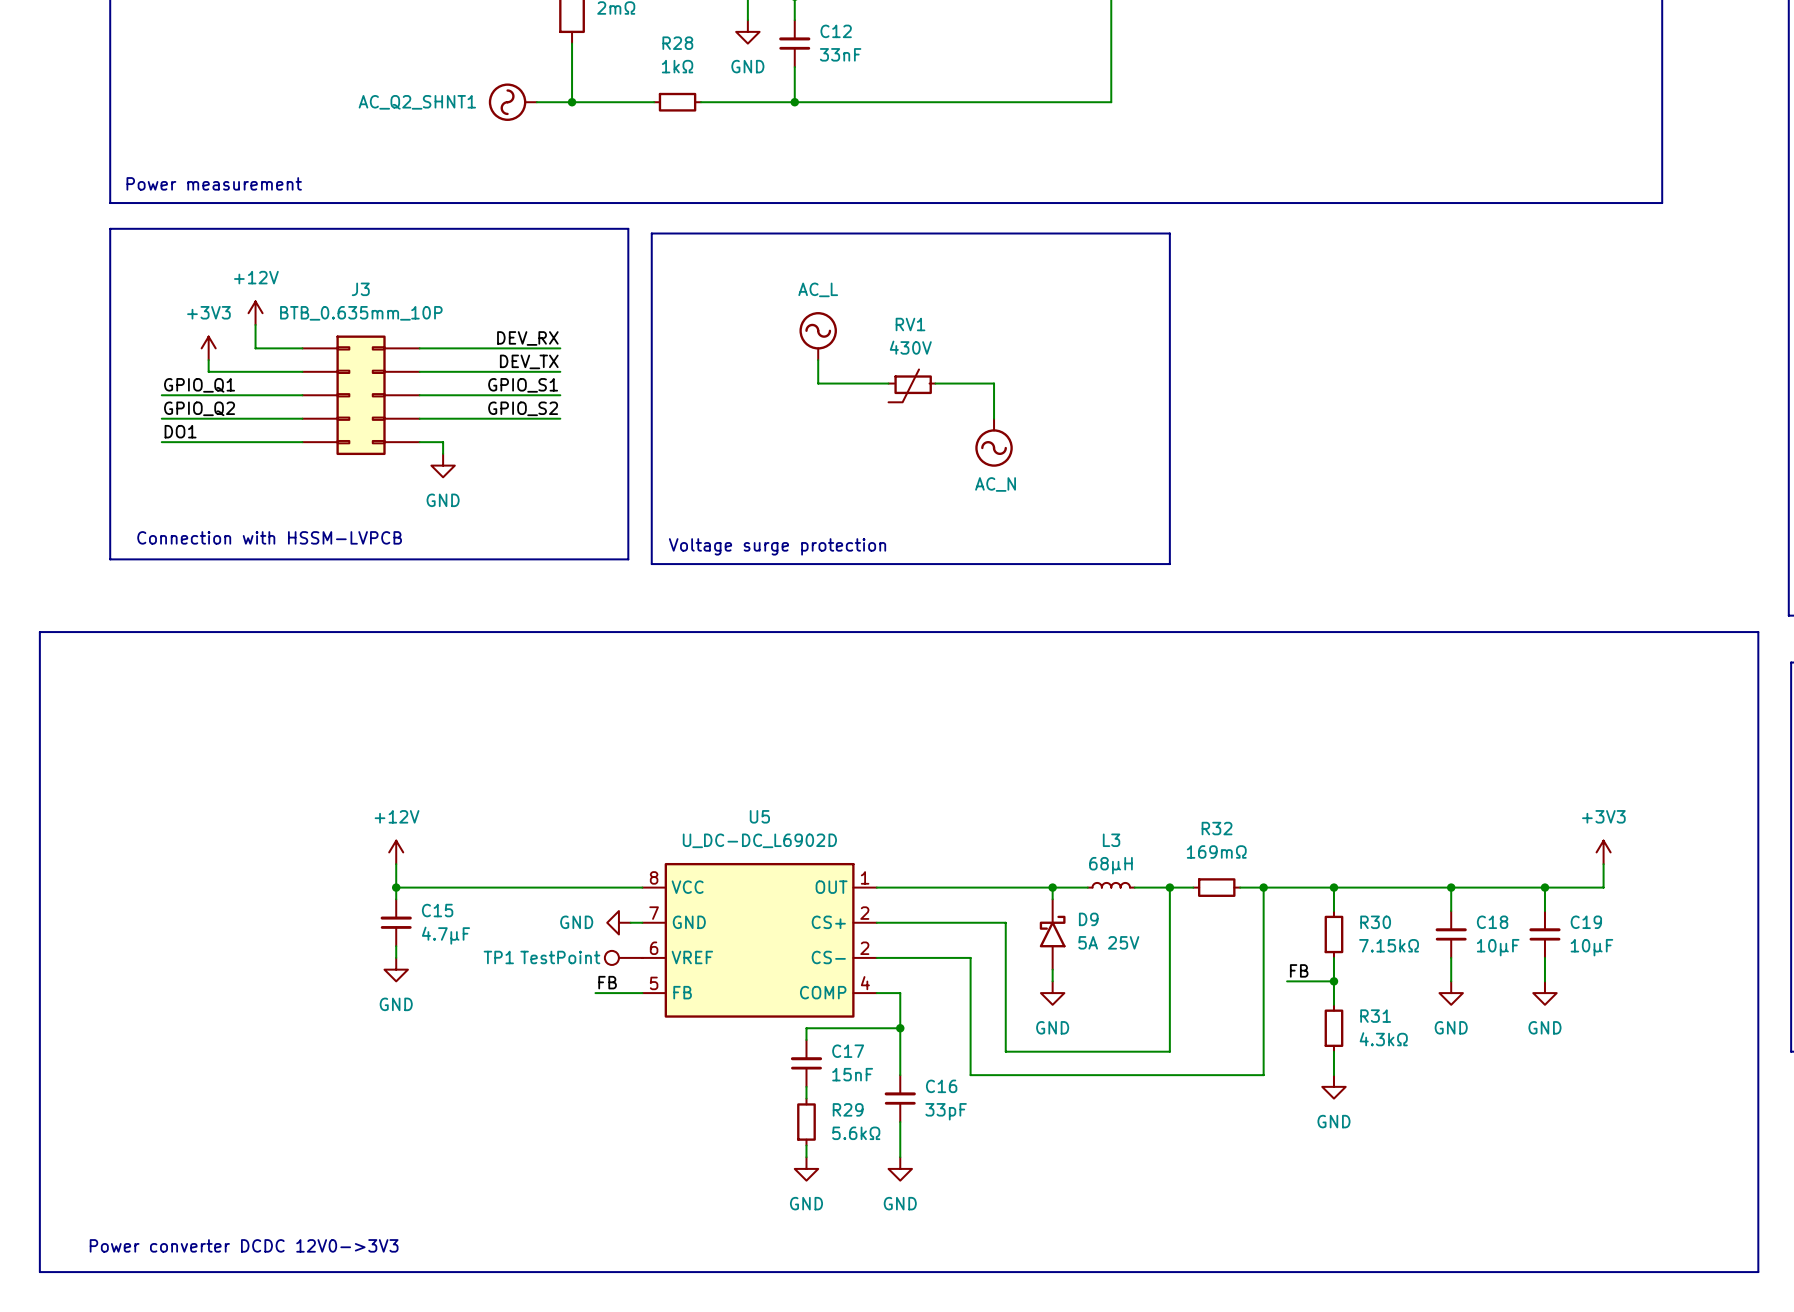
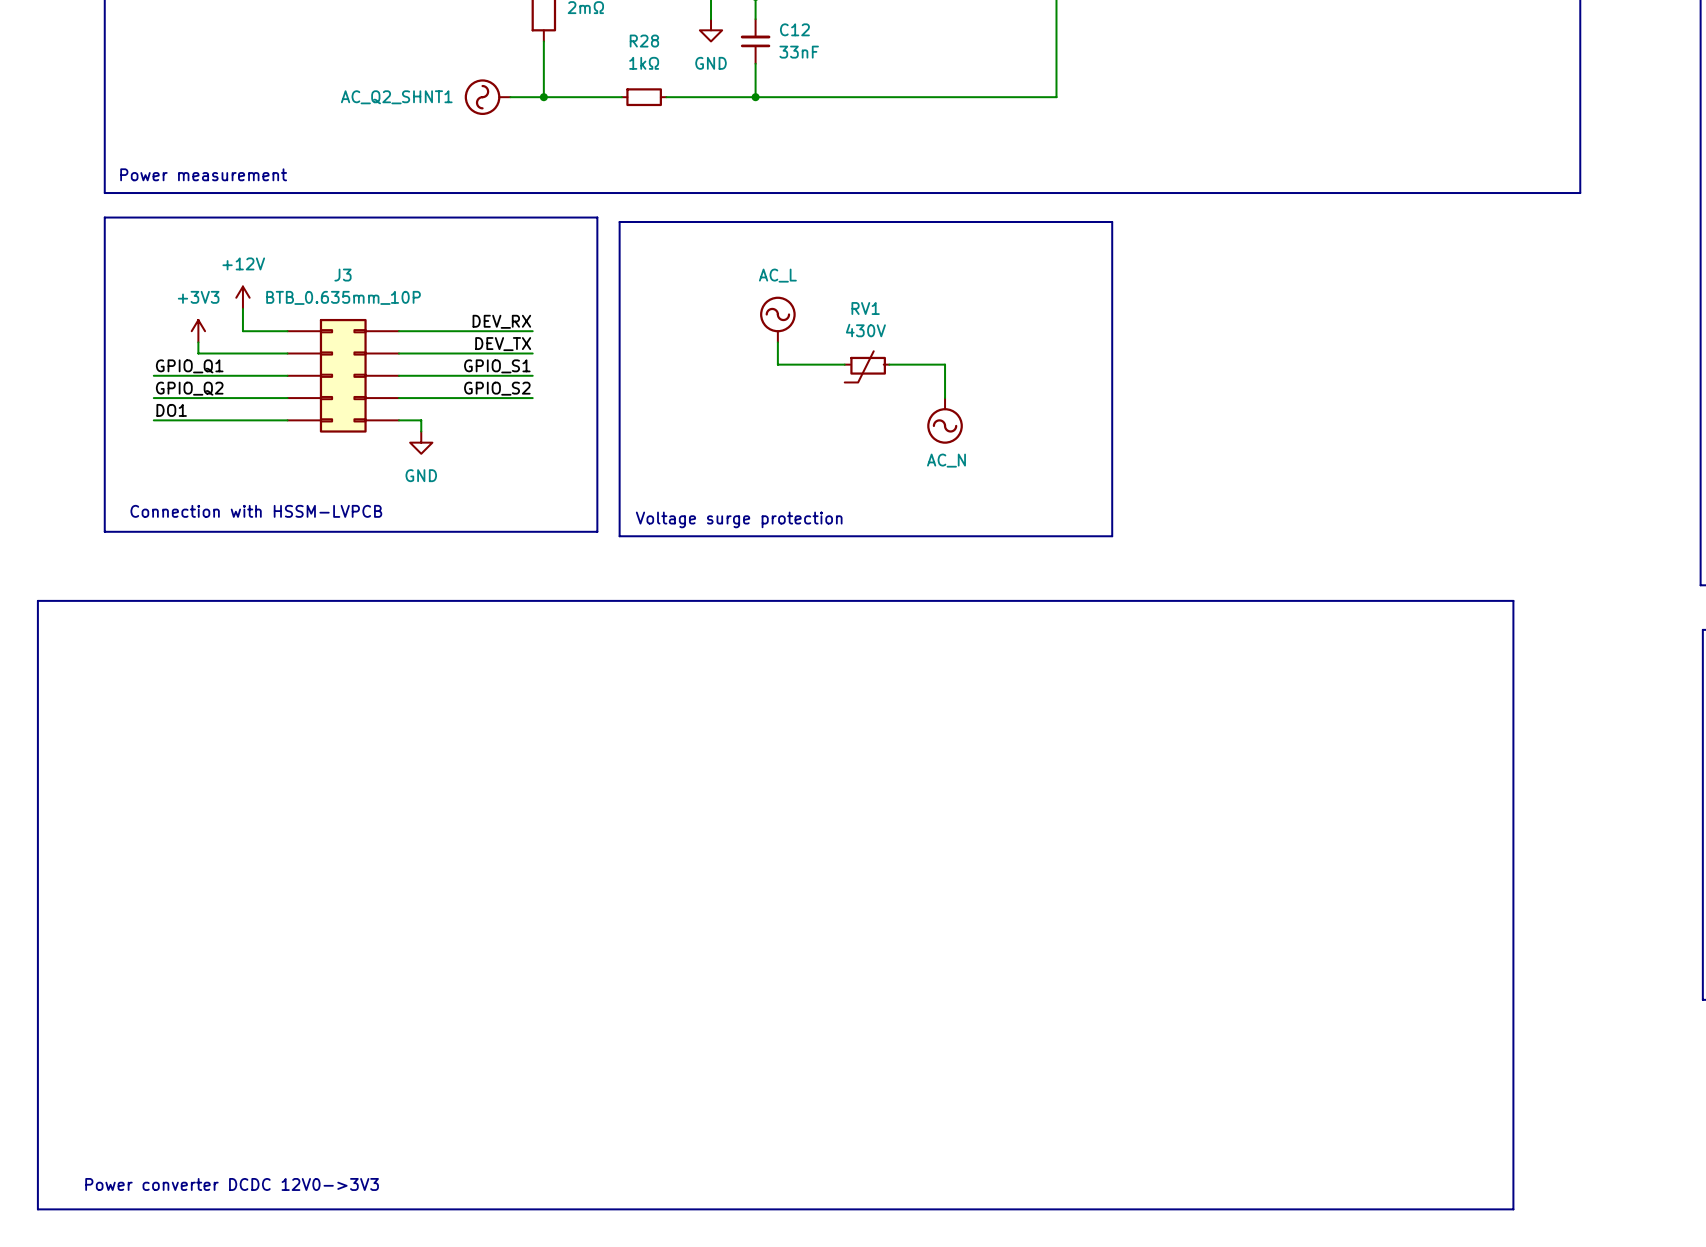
line: (1591, 632) (1758, 632) (1758, 1272) (1591, 1272) -> (1513, 600) (1513, 1209)
power symbol: +12V (396, 852) -> none
power symbol: +3V3 (1603, 852) -> none
wire: (396, 864) (396, 899) -> none
wire: (1603, 864) (1603, 887) (1240, 887) -> none
L3: (1111, 885) -> none
wire: (396, 887) (642, 887) -> none
junction: (396, 887) -> none
wire: (876, 887) (1087, 887) -> none
wire: (1052, 887) (1052, 899) -> none
junction: (1052, 887) -> none
wire: (1134, 887) (1193, 887) -> none
wire: (1169, 887) (1169, 1051) (1005, 1051) (1005, 922) (876, 922) -> none
junction: (1169, 887) -> none
R32: (1216, 887) -> none
wire: (1263, 887) (1263, 1075) (970, 1075) (970, 957) (876, 957) -> none
junction: (1263, 887) -> none
wire: (1333, 887) (1333, 911) -> none
junction: (1333, 887) -> none
wire: (1451, 887) (1451, 911) -> none
junction: (1451, 887) -> none
wire: (1544, 887) (1544, 911) -> none
junction: (1544, 887) -> none
C15: (396, 922) -> none
power symbol: GND (618, 922) -> none
wire: (630, 922) (642, 922) -> none
D9: (1052, 934) -> none
R30: (1333, 934) -> none
C18: (1451, 934) -> none
C19: (1544, 934) -> none
U5: (759, 940) -> none
wire: (396, 946) (396, 957) -> none
TP1: TestPoint (623, 957) -> none
wire: (1333, 957) (1333, 1004) -> none
wire: (1451, 957) (1451, 981) -> none
wire: (1544, 957) (1544, 981) -> none
power symbol: GND (396, 969) -> none
wire: (1052, 969) (1052, 981) -> none
label: FB (1299, 970) -> none
wire: (1287, 981) (1333, 981) -> none
junction: (1333, 981) -> none
label: FB (607, 982) -> none
wire: (595, 993) (642, 993) -> none
wire: (876, 993) (900, 993) (900, 1075) -> none
power symbol: GND (1052, 993) -> none
power symbol: GND (1451, 993) -> none
power symbol: GND (1544, 993) -> none
wire: (900, 1028) (806, 1028) (806, 1039) -> none
junction: (900, 1028) -> none
R31: (1333, 1028) -> none
wire: (1333, 1051) (1333, 1075) -> none
C17: (806, 1063) -> none
wire: (806, 1086) (806, 1098) -> none
power symbol: GND (1333, 1086) -> none
C16: (900, 1098) -> none
R29: (806, 1122) -> none
wire: (900, 1122) (900, 1157) -> none
wire: (806, 1145) (806, 1157) -> none
power symbol: GND (806, 1168) -> none
power symbol: GND (900, 1168) -> none

